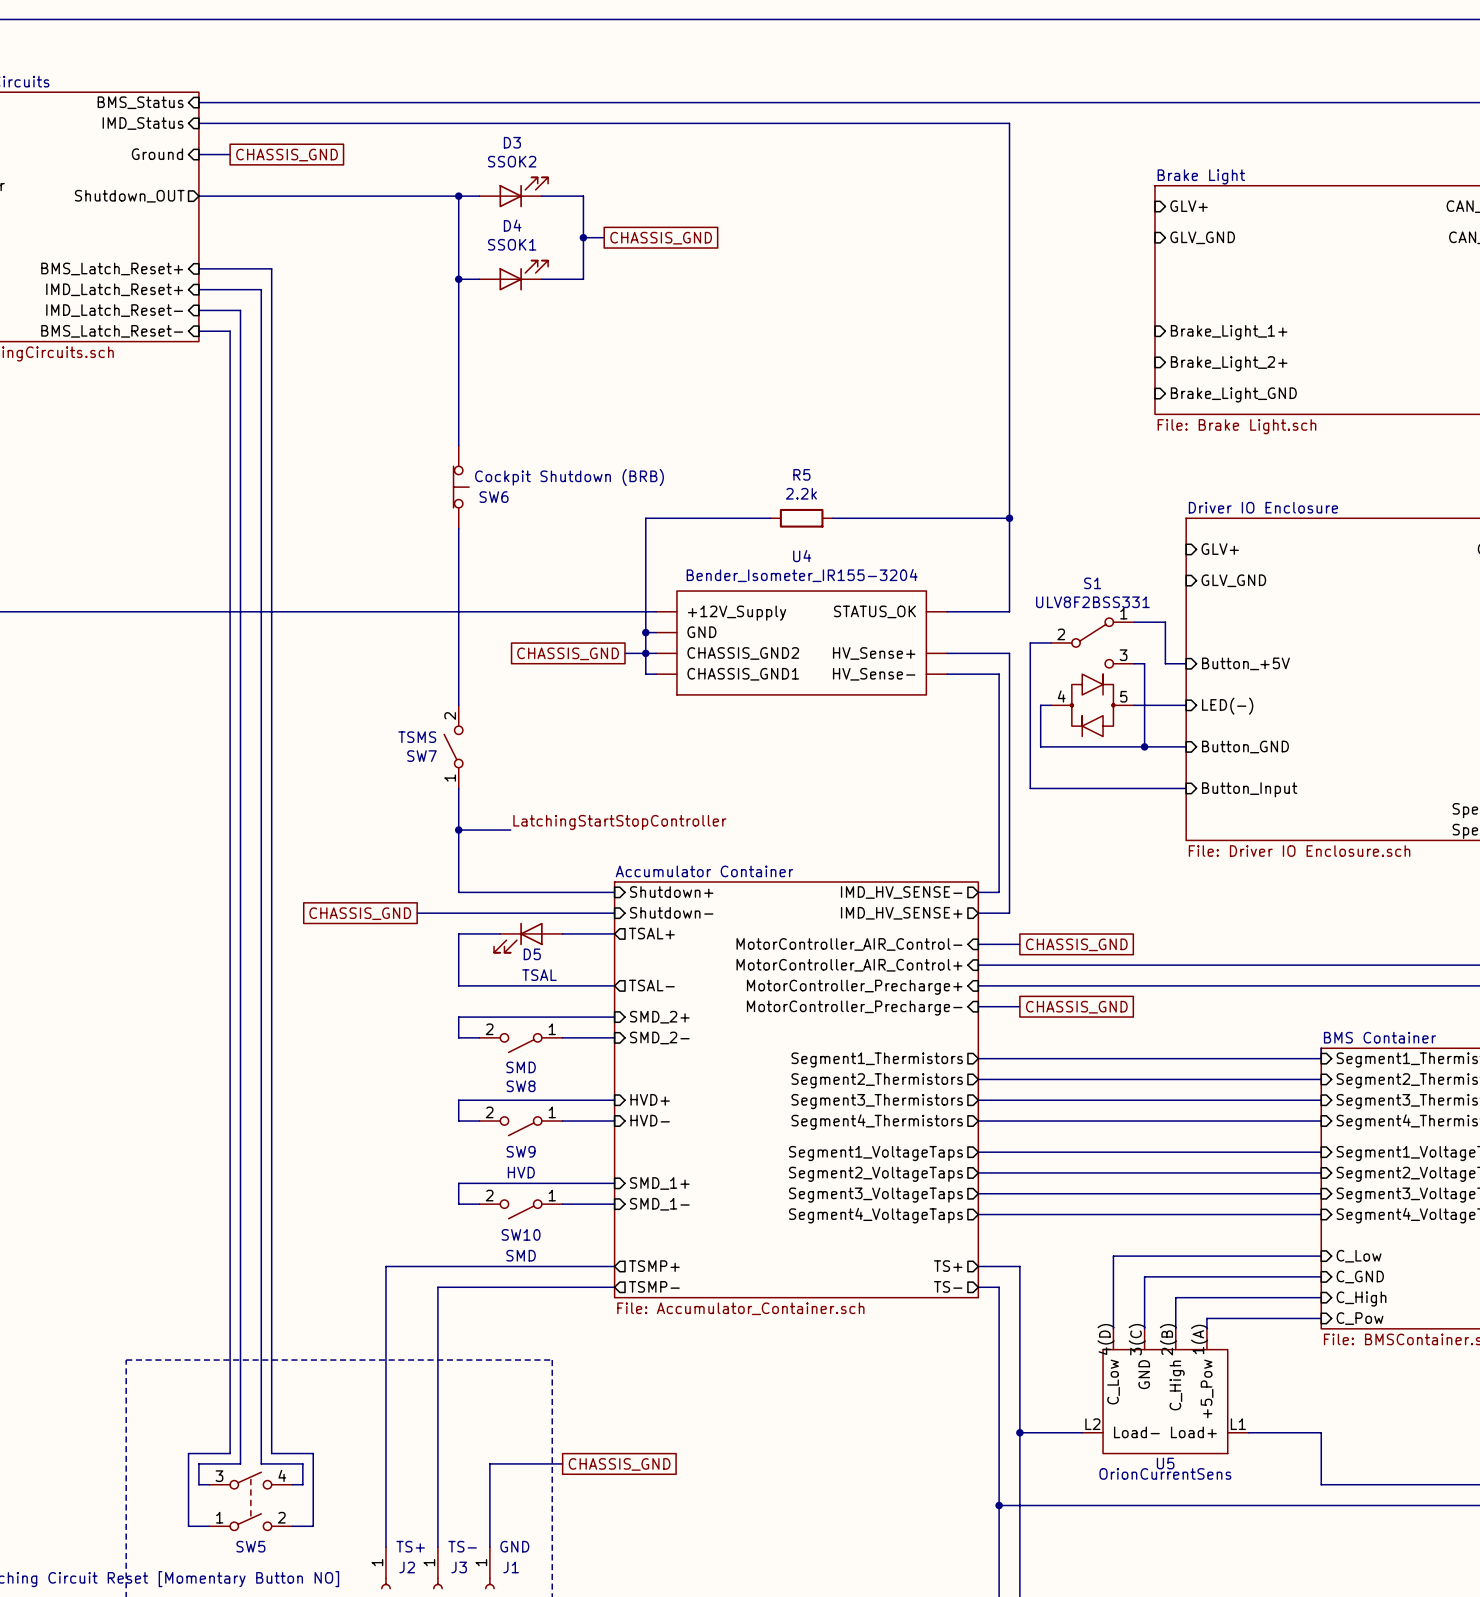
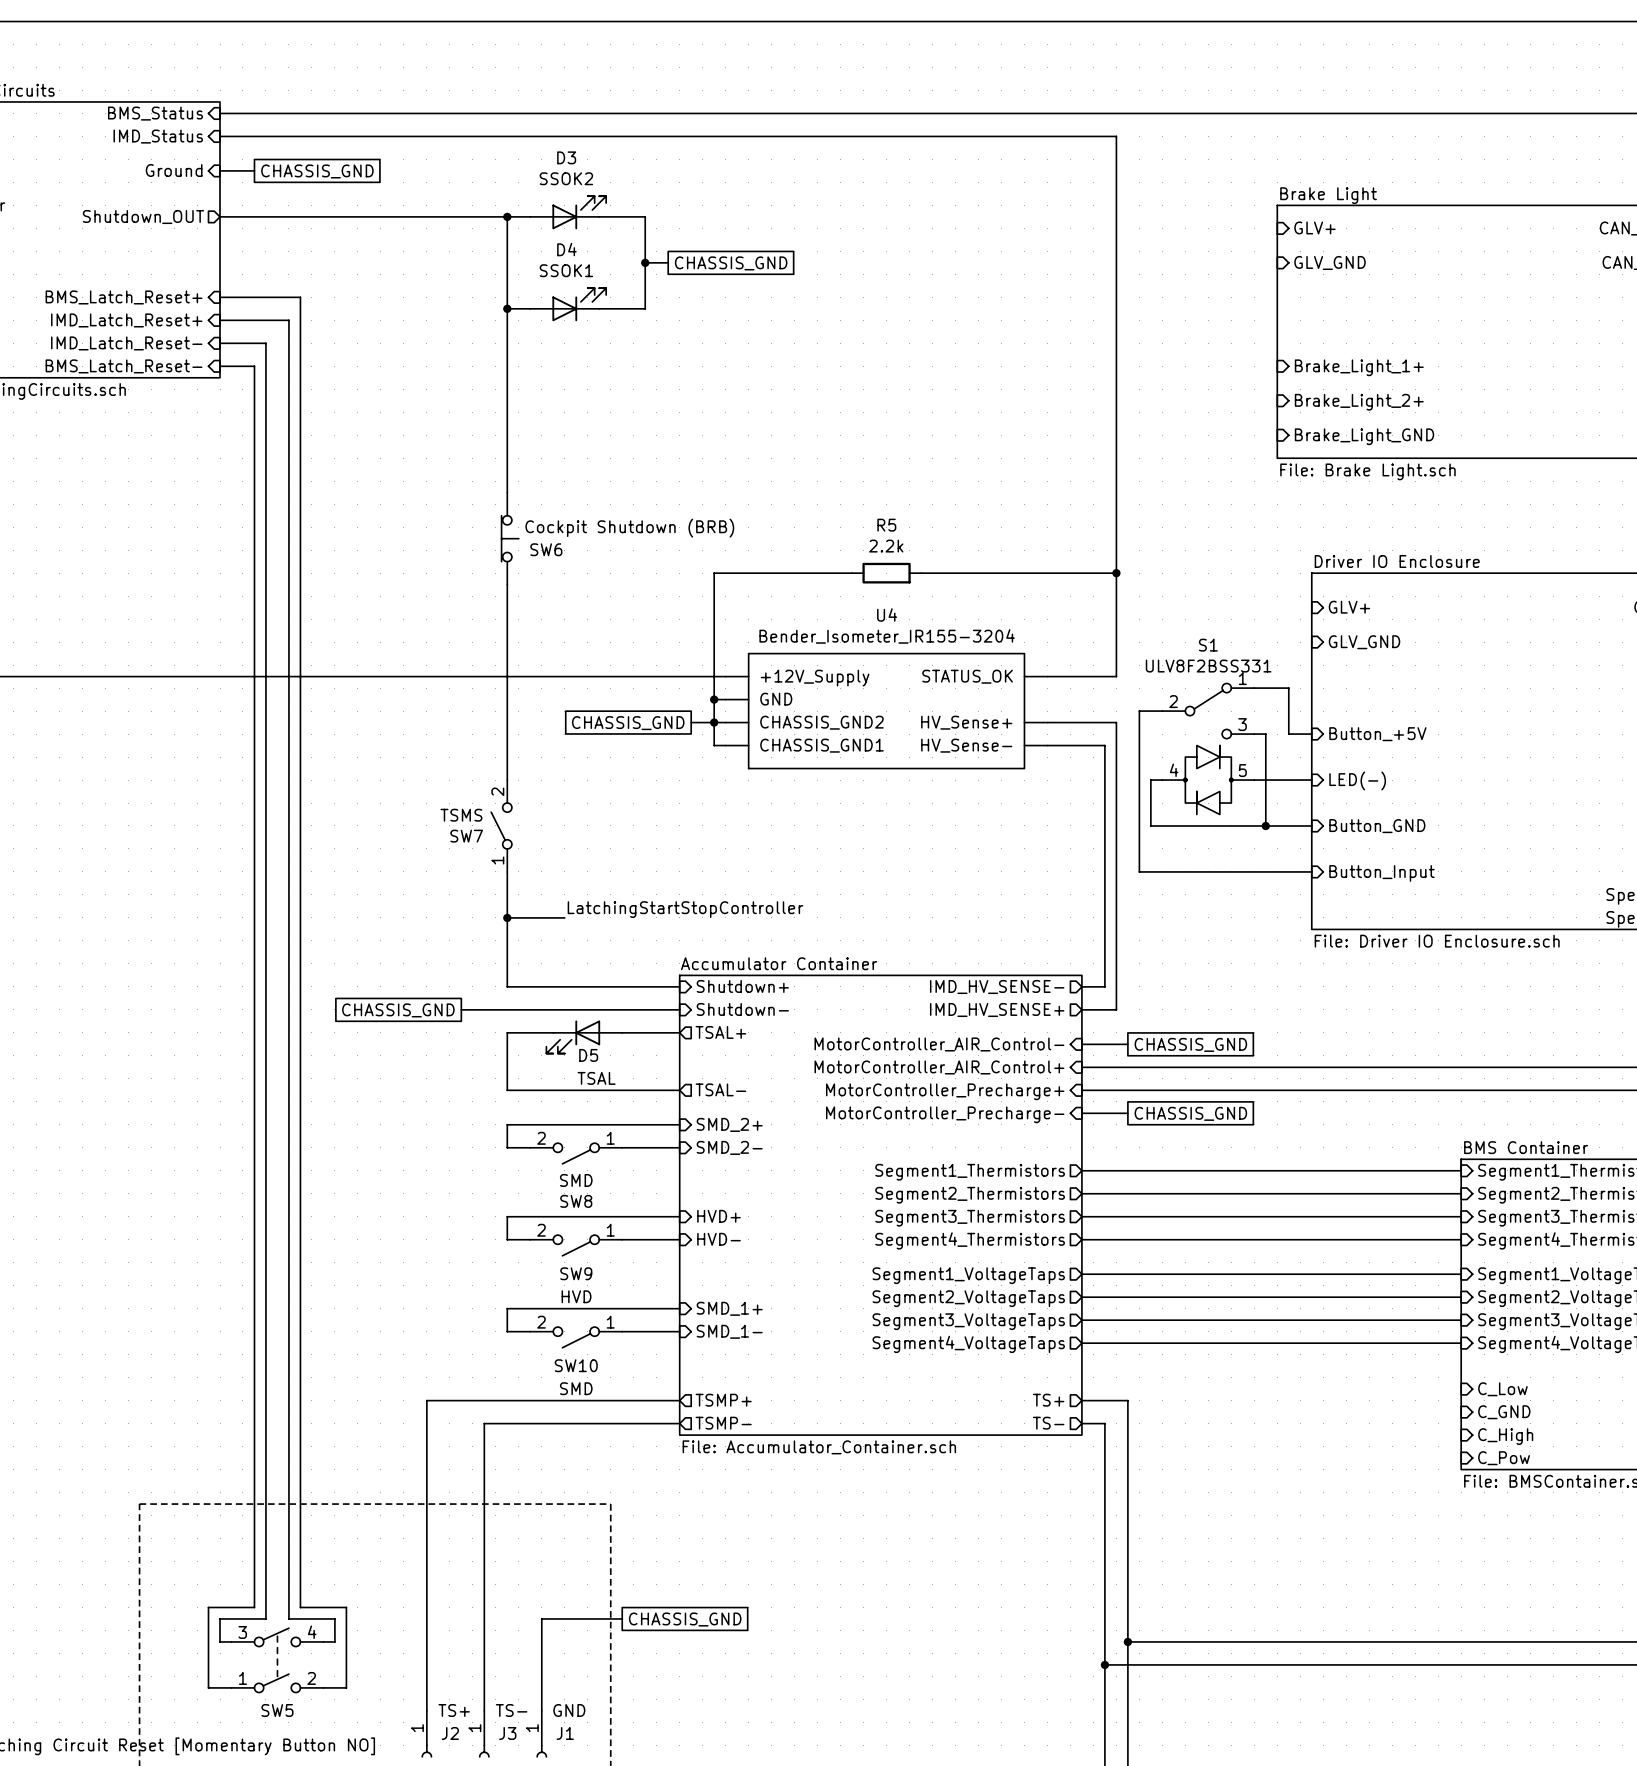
wire: (1321, 1256) (1113, 1256) (1113, 1328) -> none
wire: (1321, 1276) (1144, 1276) (1144, 1328) -> none
wire: (1321, 1297) (1175, 1297) (1175, 1328) -> none
wire: (1321, 1318) (1206, 1318) (1206, 1328) -> none
U5: OrionCurrentSens (1165, 1391) -> none
wire: (1019, 1432) (1082, 1432) -> none
junction: (1019, 1432) -> none
wire: (1248, 1432) (1321, 1432) (1321, 1484) -> (1127, 1641) (1461, 1641)
junction: none -> (1127, 1641)

